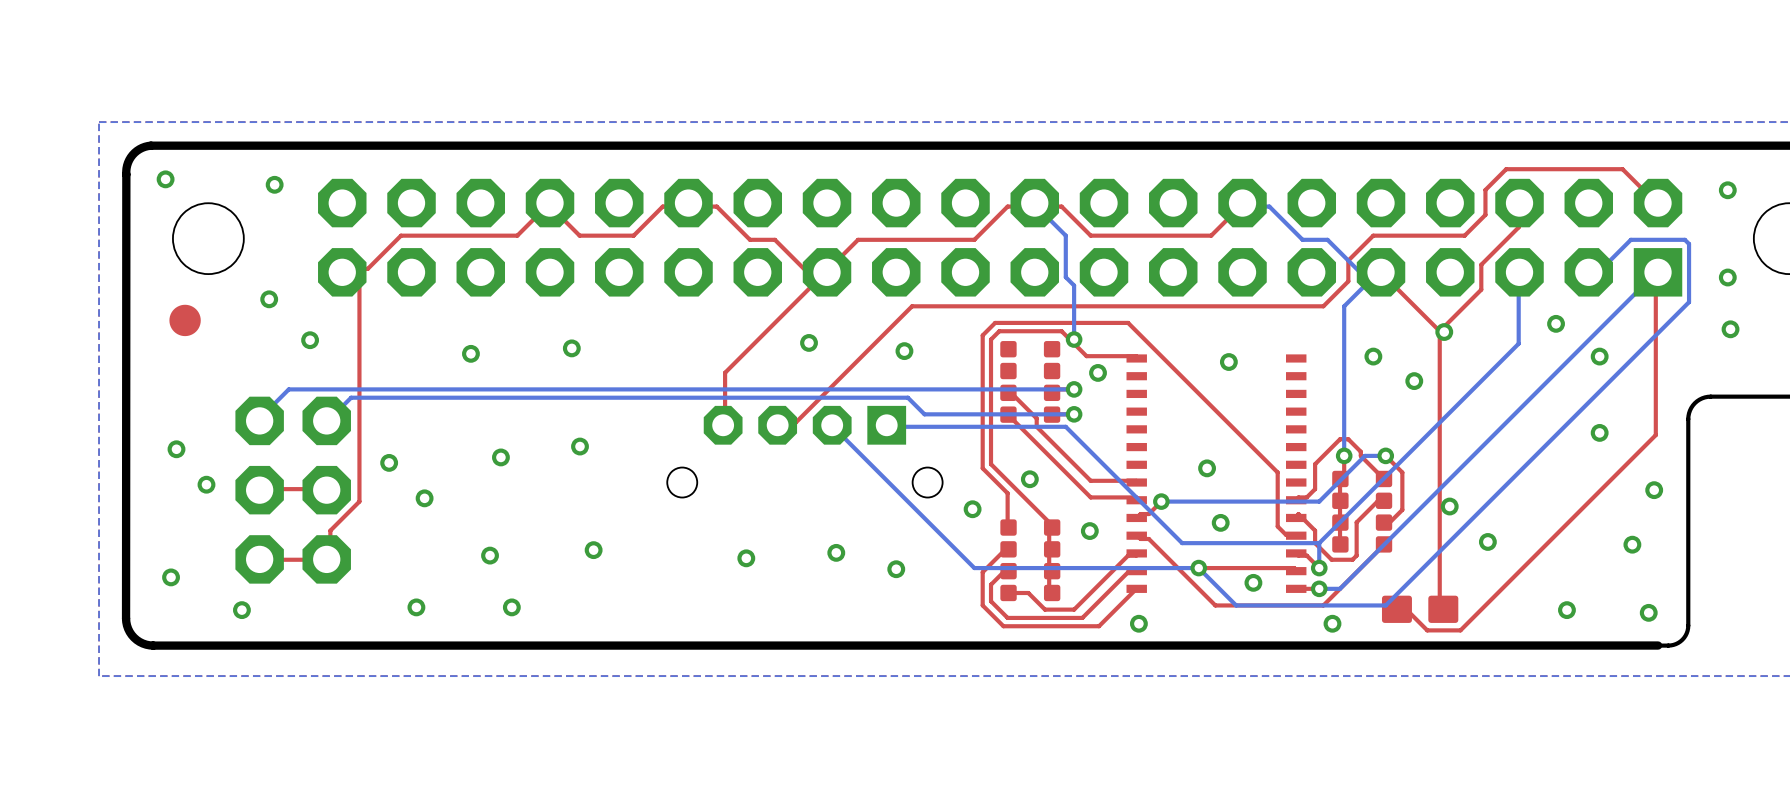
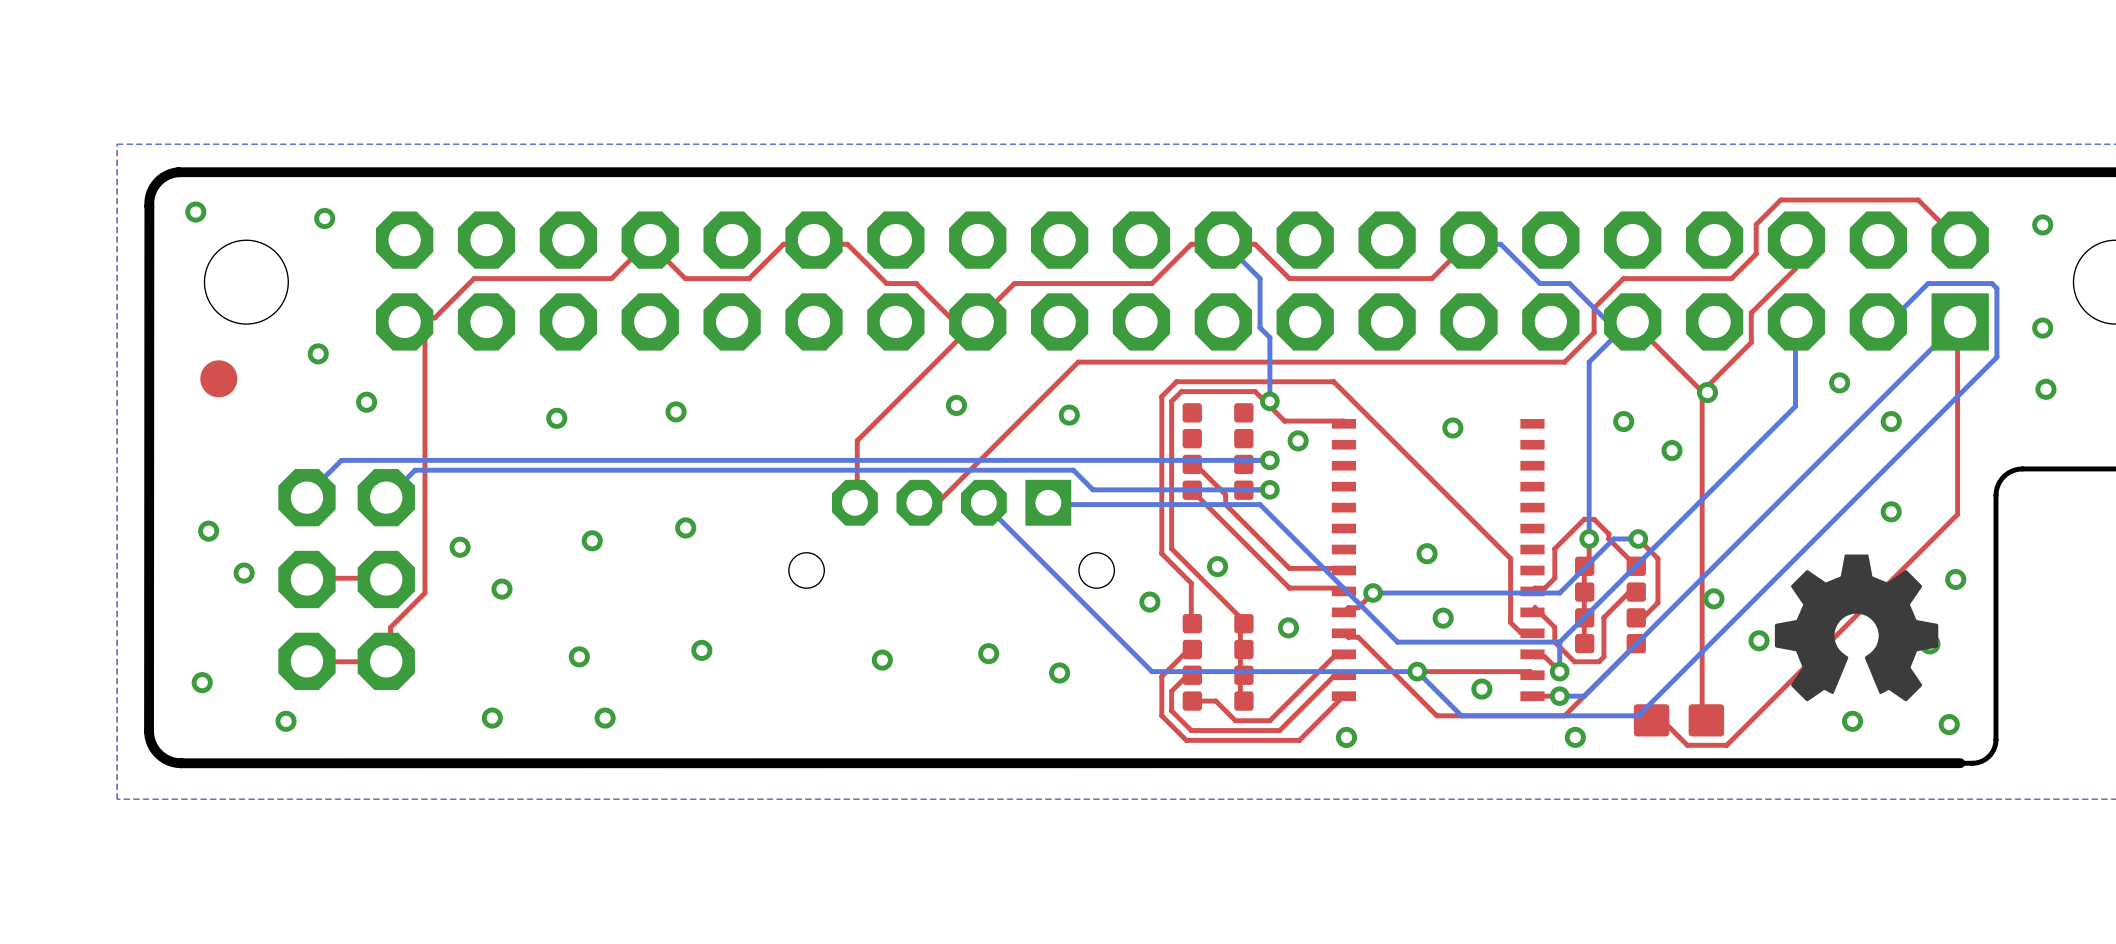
drawing: none -> [1774, 554, 1939, 702]

